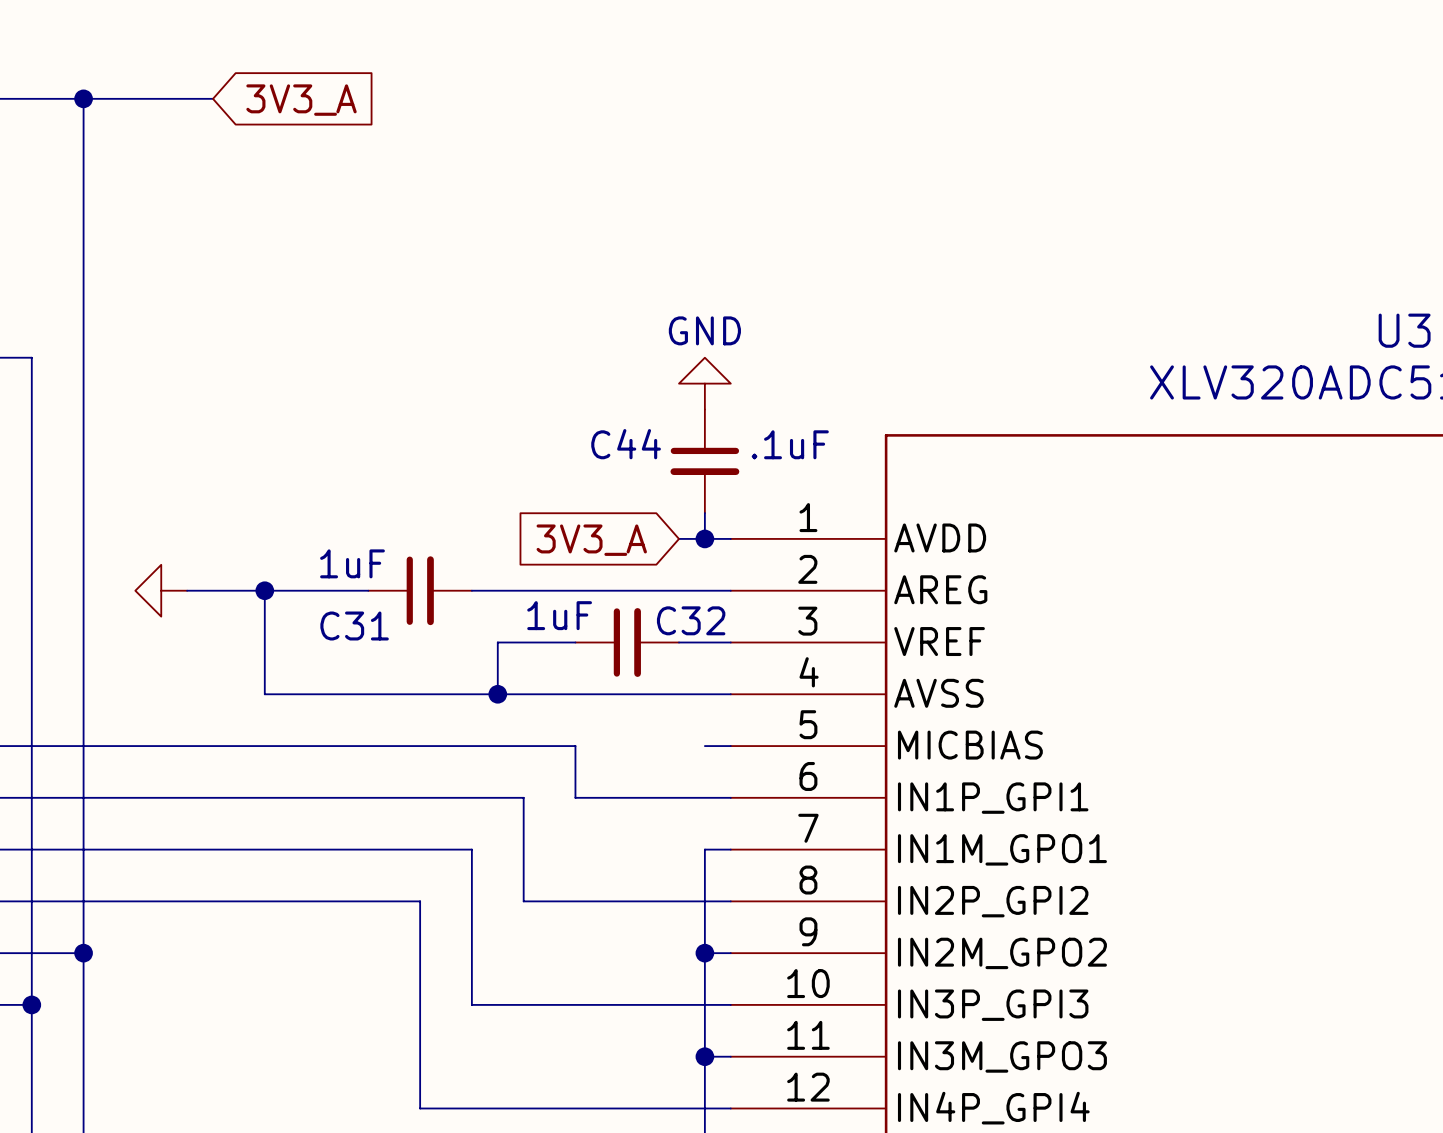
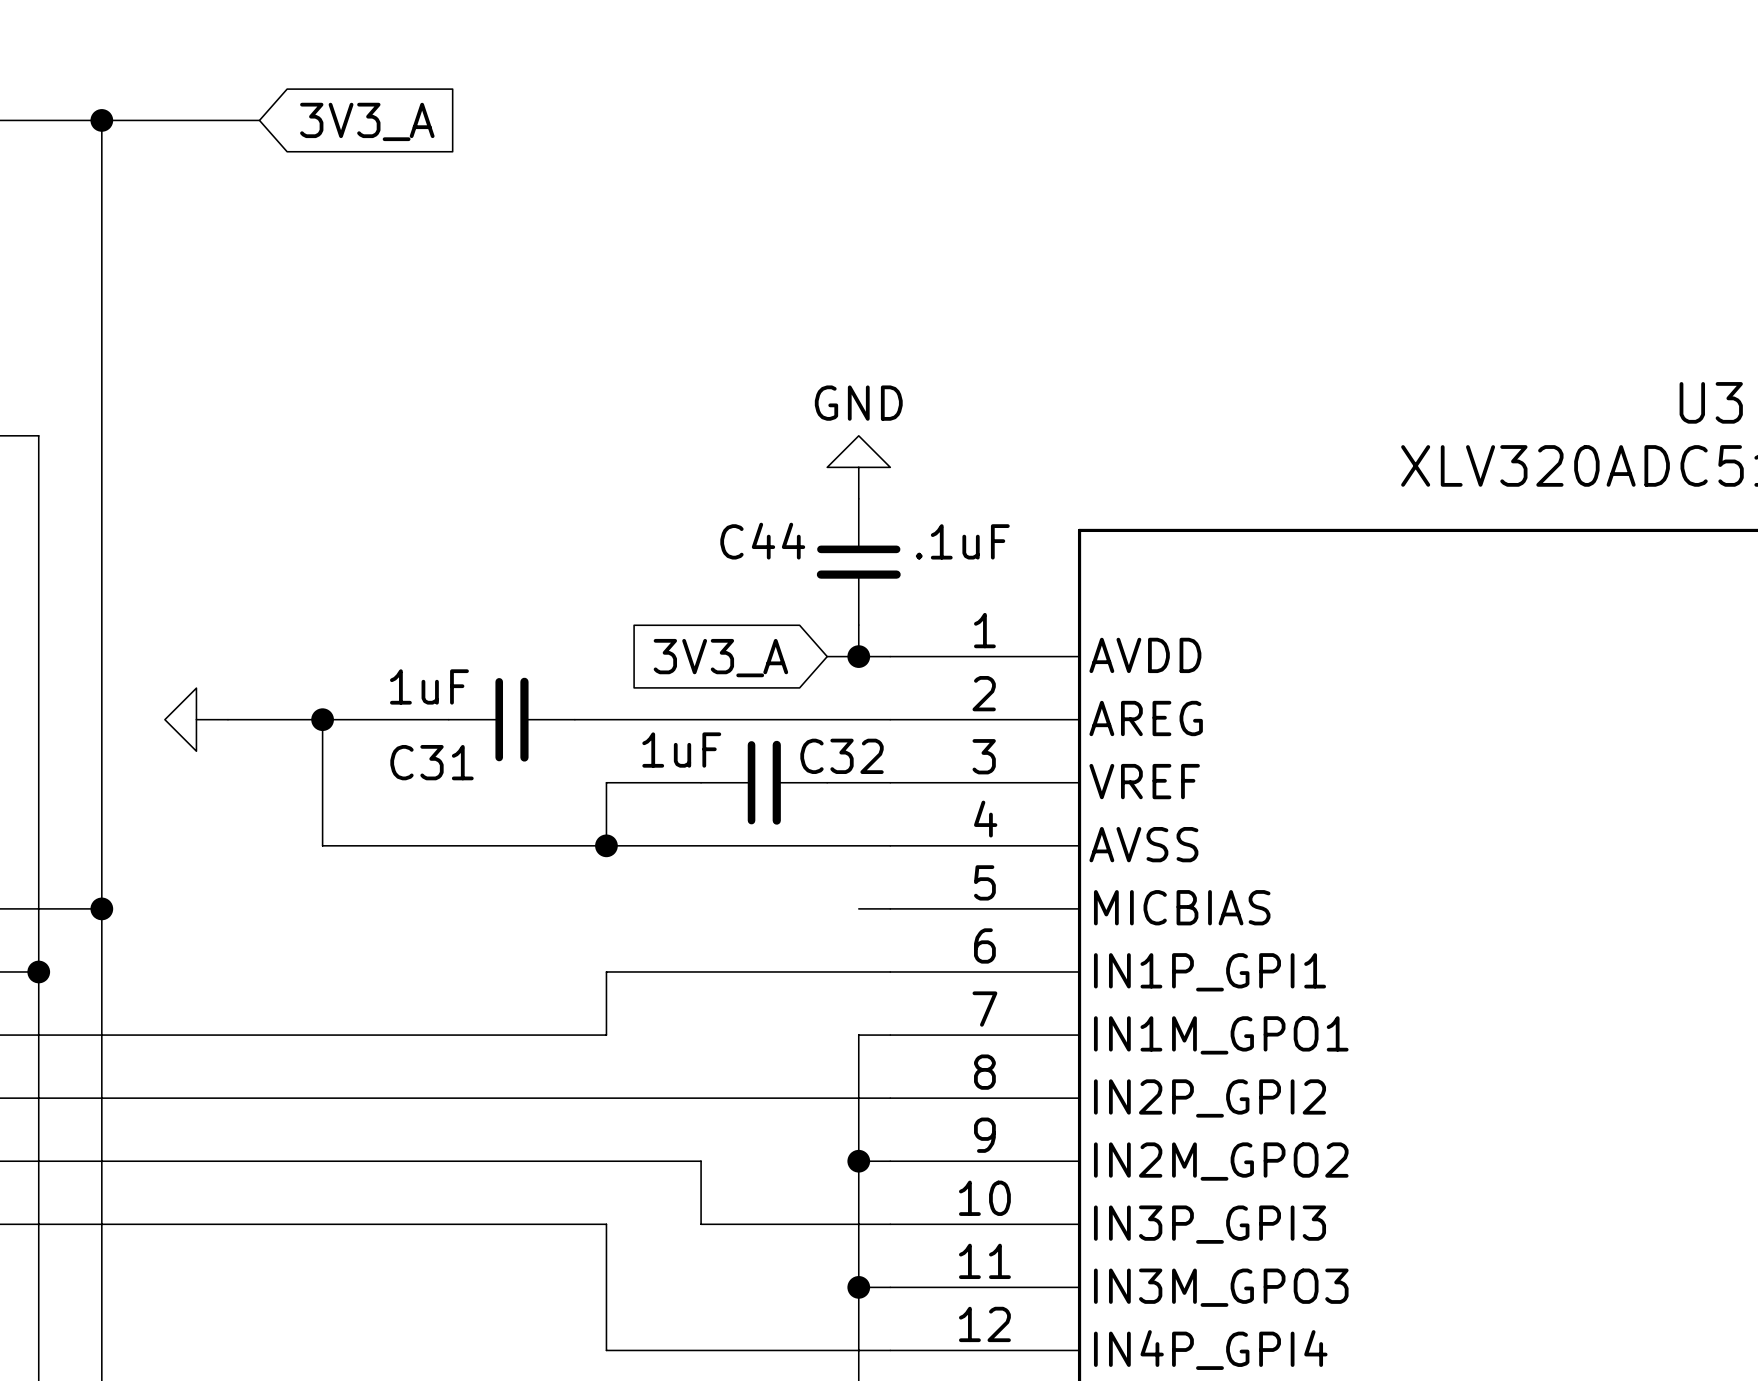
wire: (83, 746) (575, 746) (575, 797) -> (101, 1161) (701, 1161) (701, 1224)
junction: none -> (101, 908)
wire: (31, 797) (497, 797) -> none
junction: none -> (38, 971)
wire: (523, 797) (523, 901) -> (637, 971) (701, 971)
wire: (471, 849) (471, 1004) -> (574, 1035) (606, 1035) (606, 971)
wire: (420, 901) (420, 1108) (497, 1108) -> (511, 1098) (637, 1098)
junction: (83, 953) -> none
wire: none -> (38, 1224) (574, 1224)
junction: (31, 1004) -> none
wire: (497, 1004) (575, 1004) -> (606, 1224) (606, 1350)

